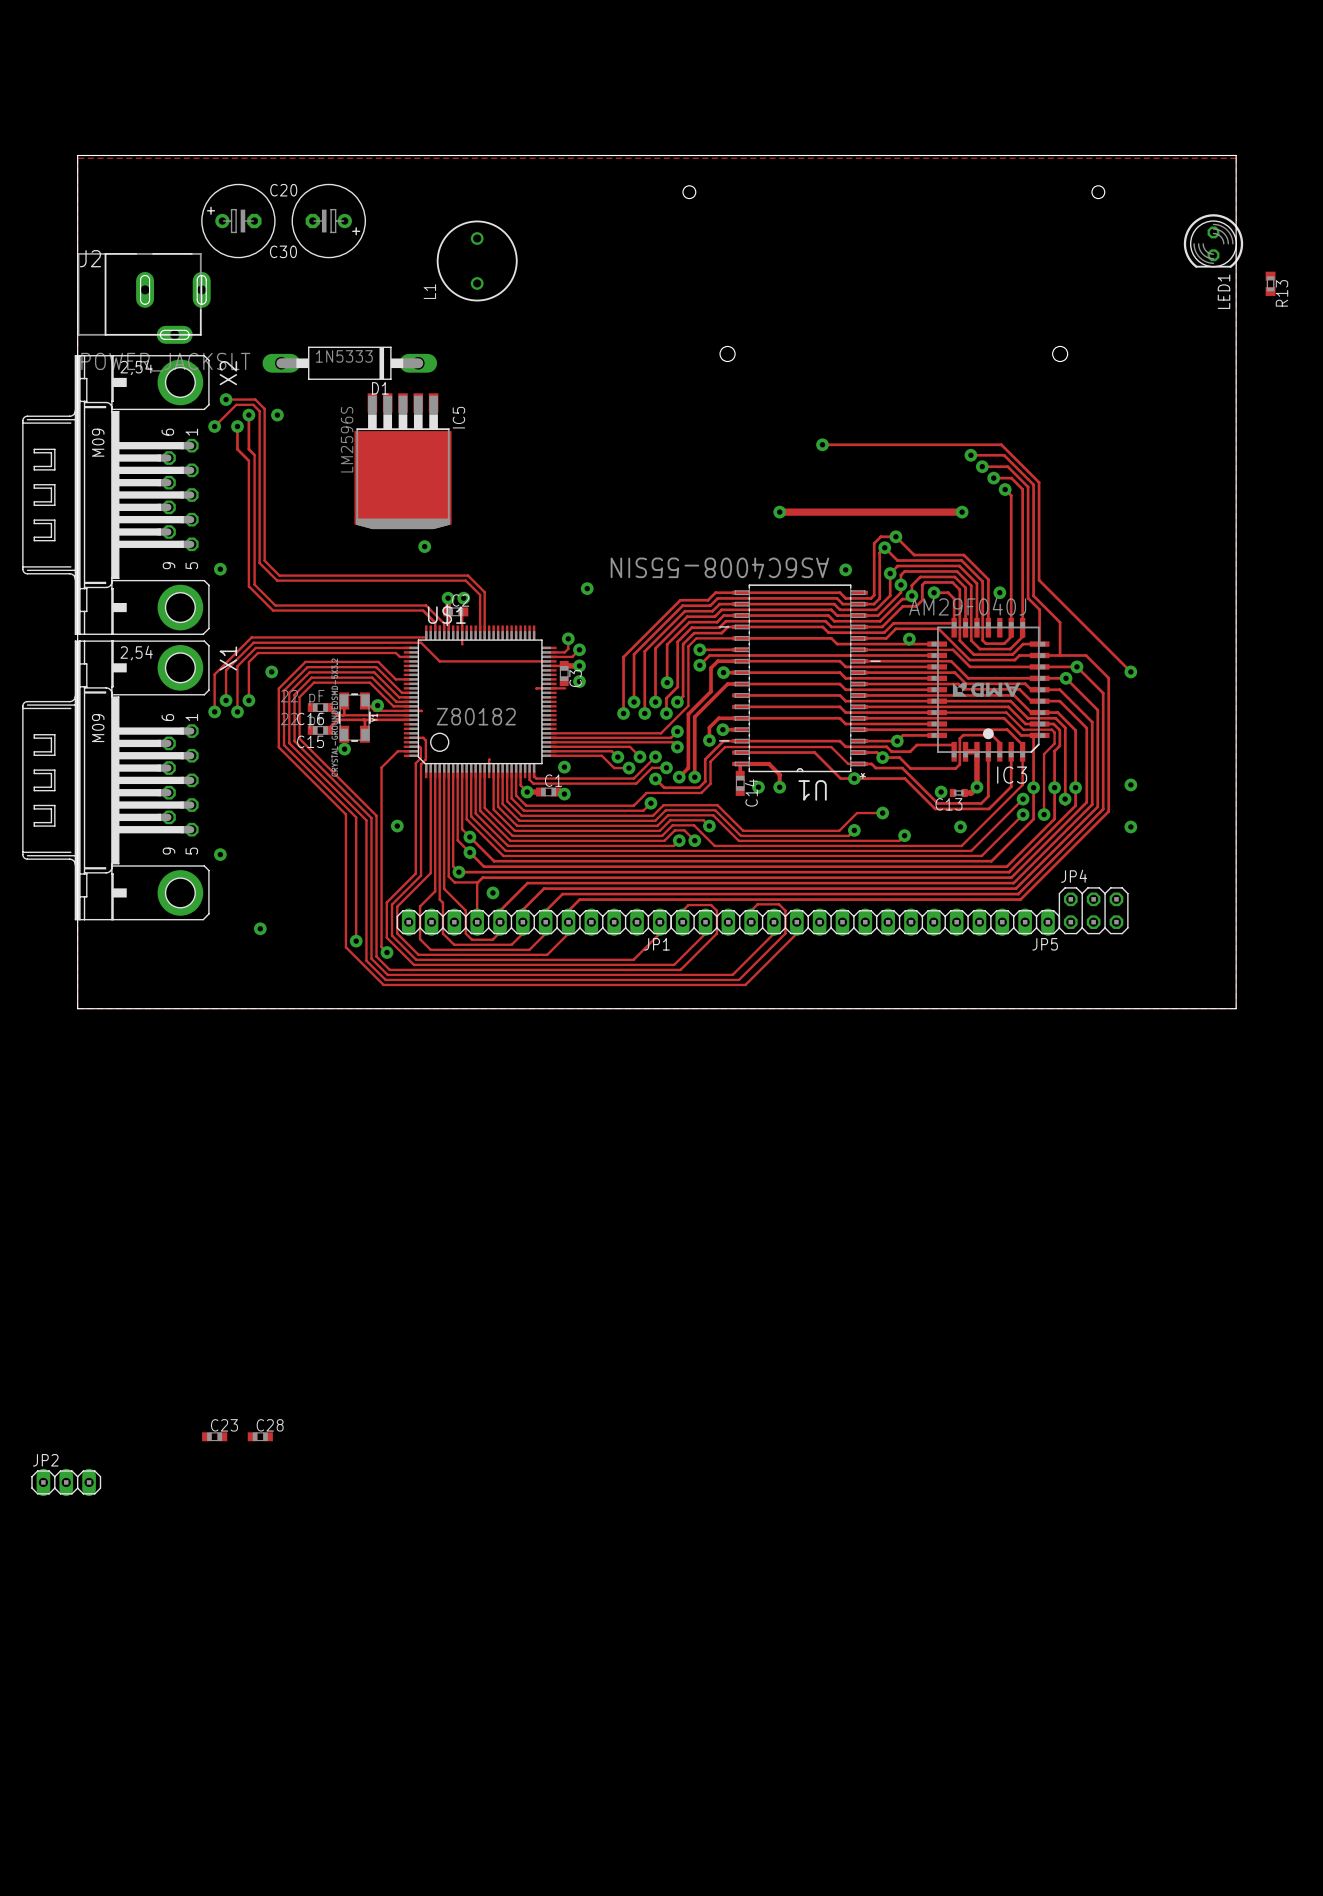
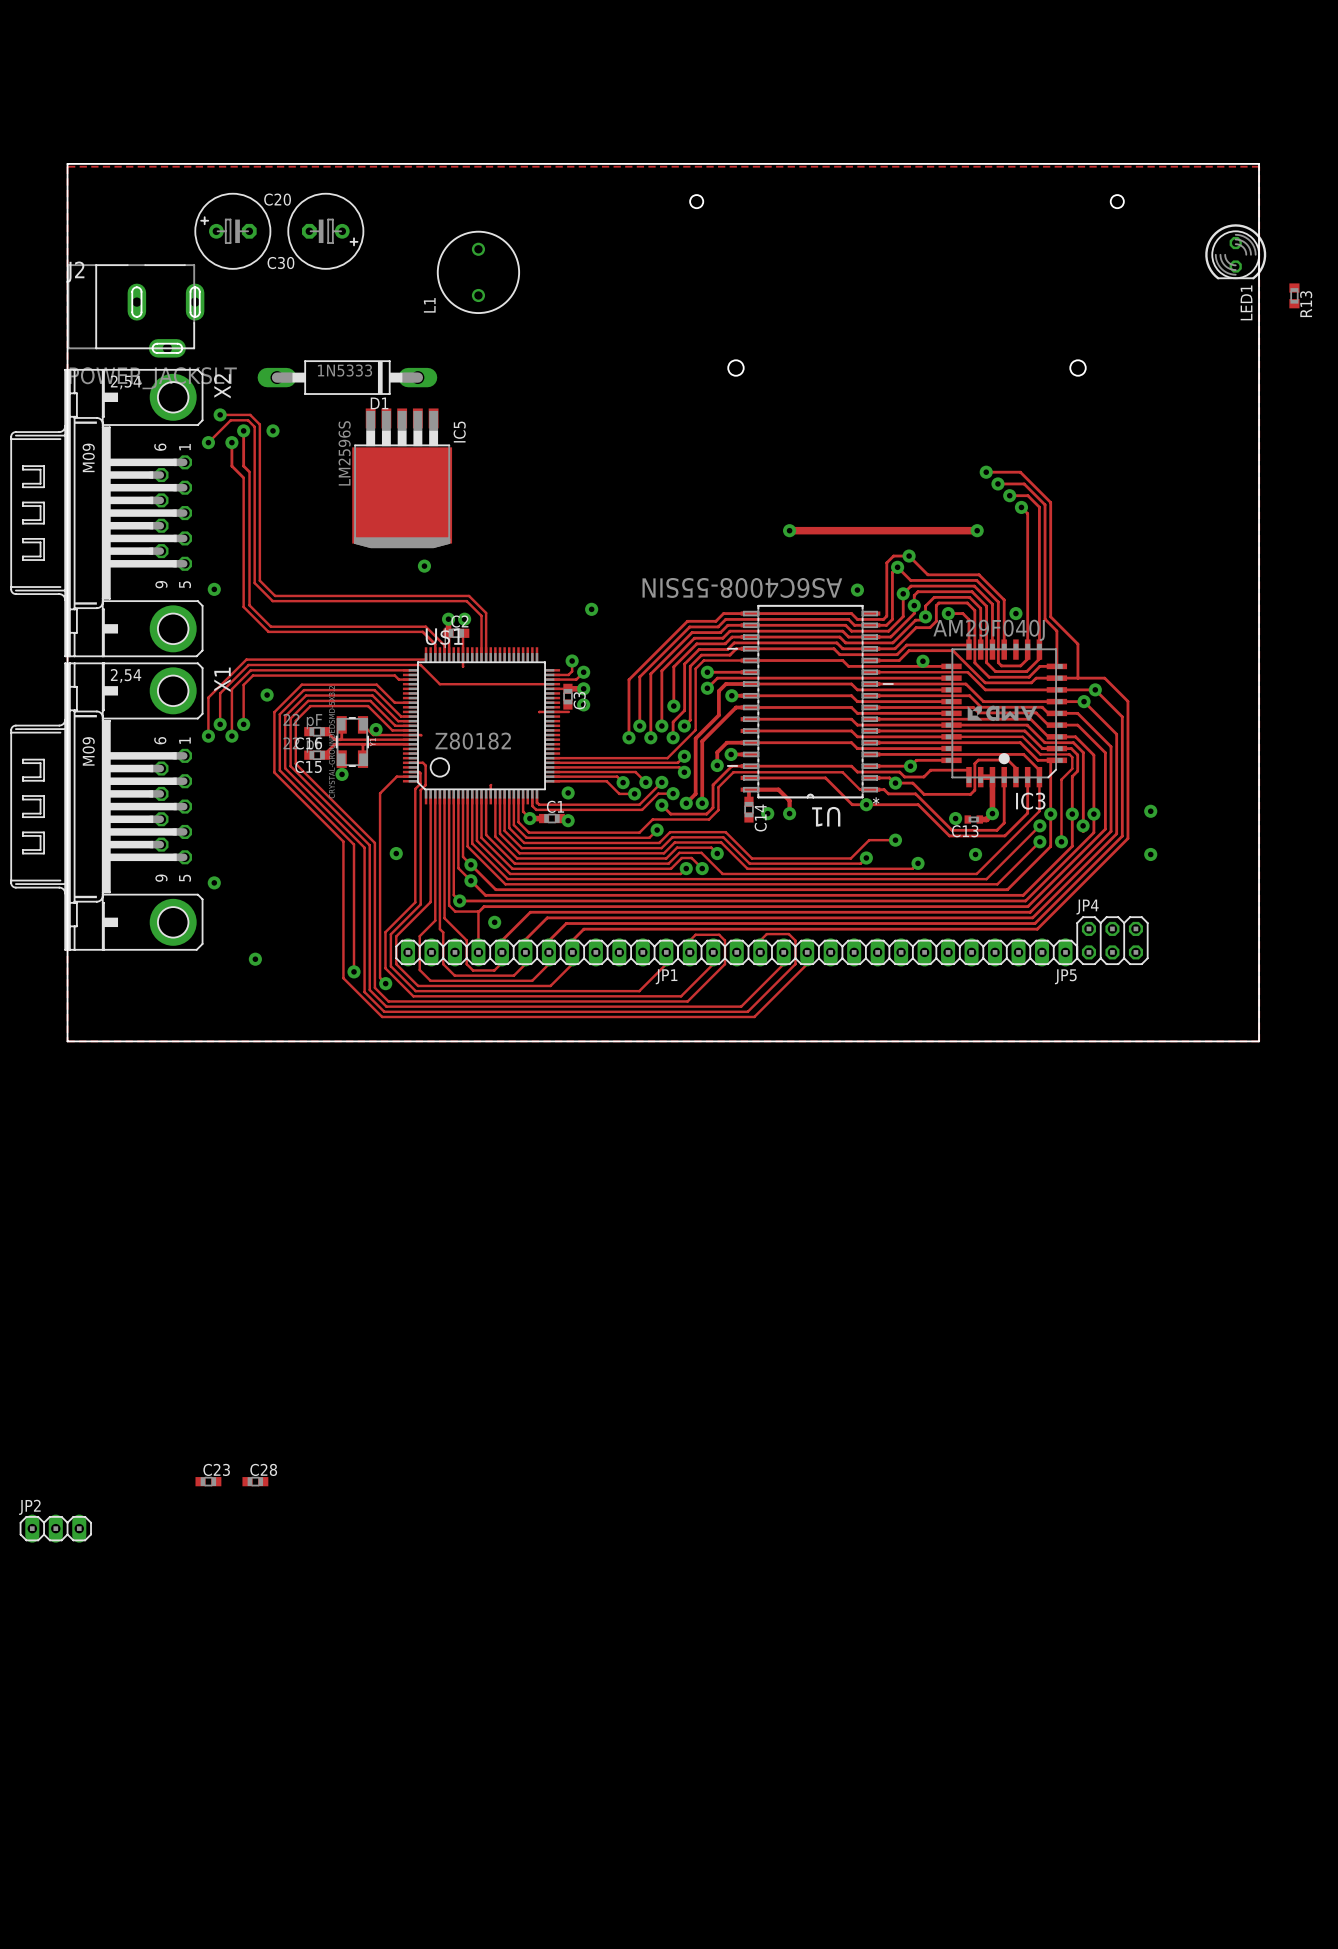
track: (822, 444) (1001, 444) (1039, 482) (1039, 580) (1130, 671) -> none
via: (822, 444) -> none
via: (1130, 671) -> none

